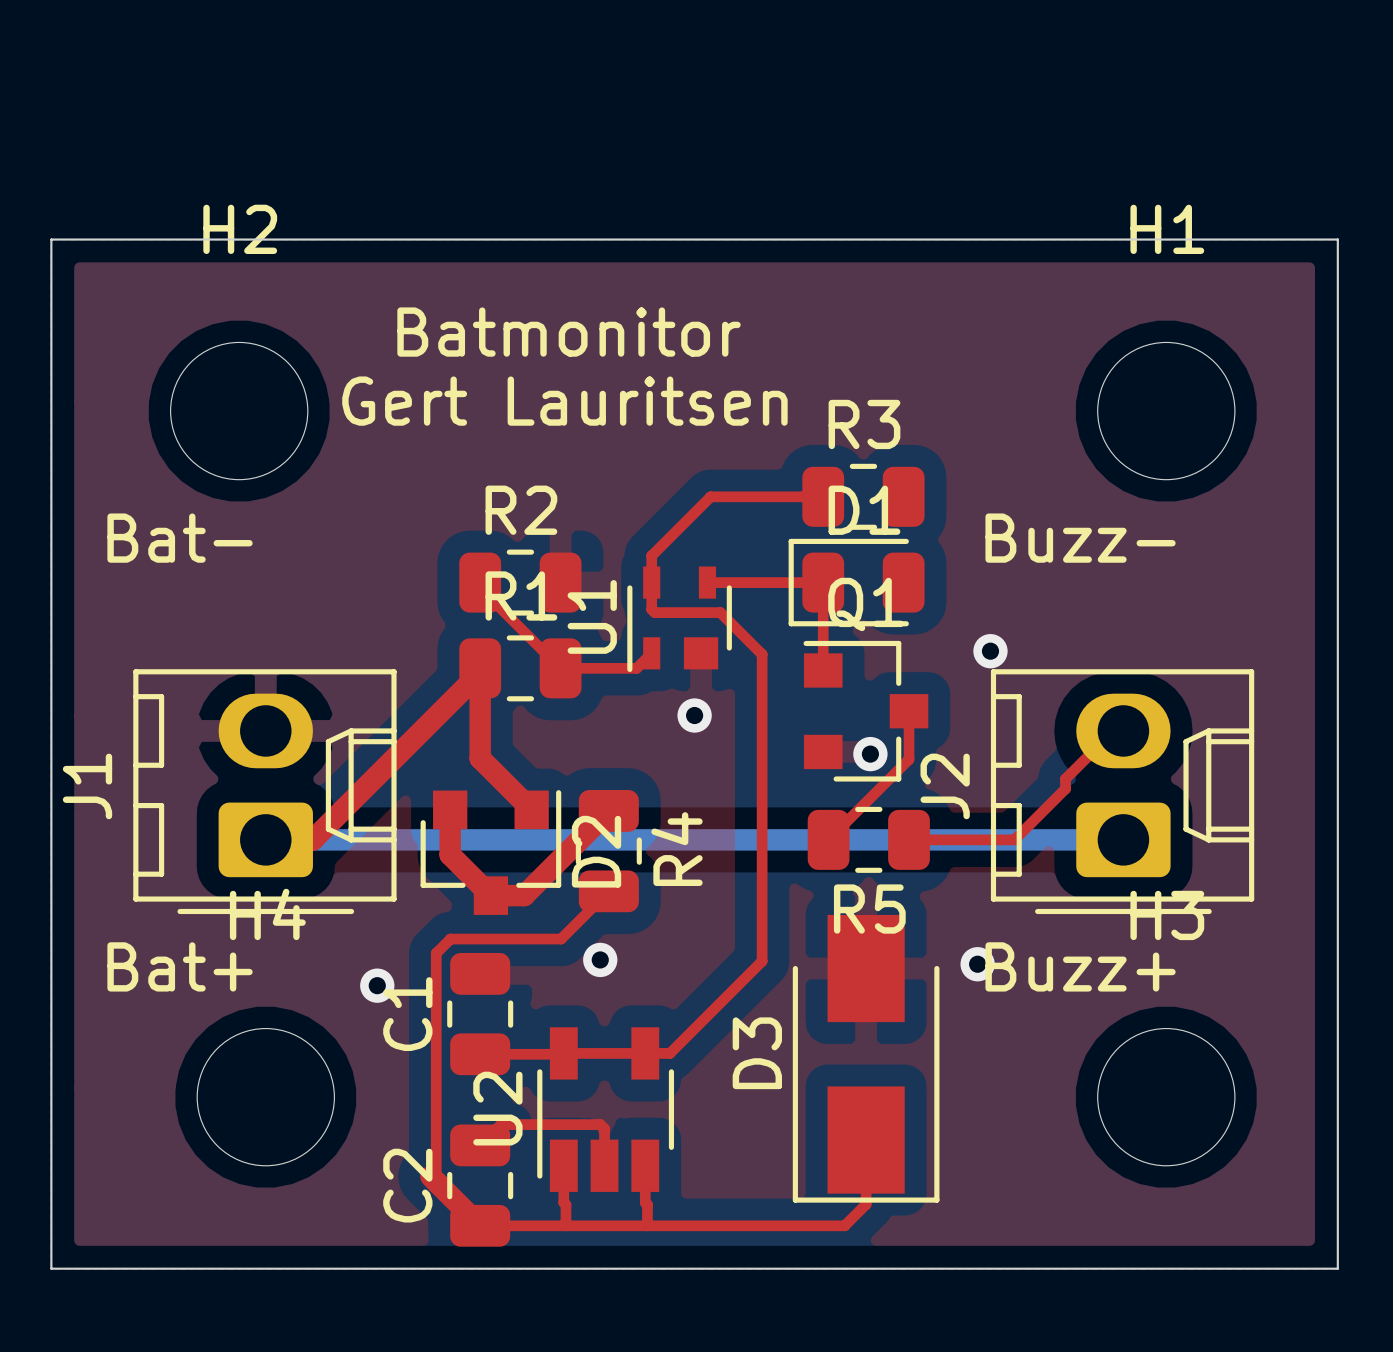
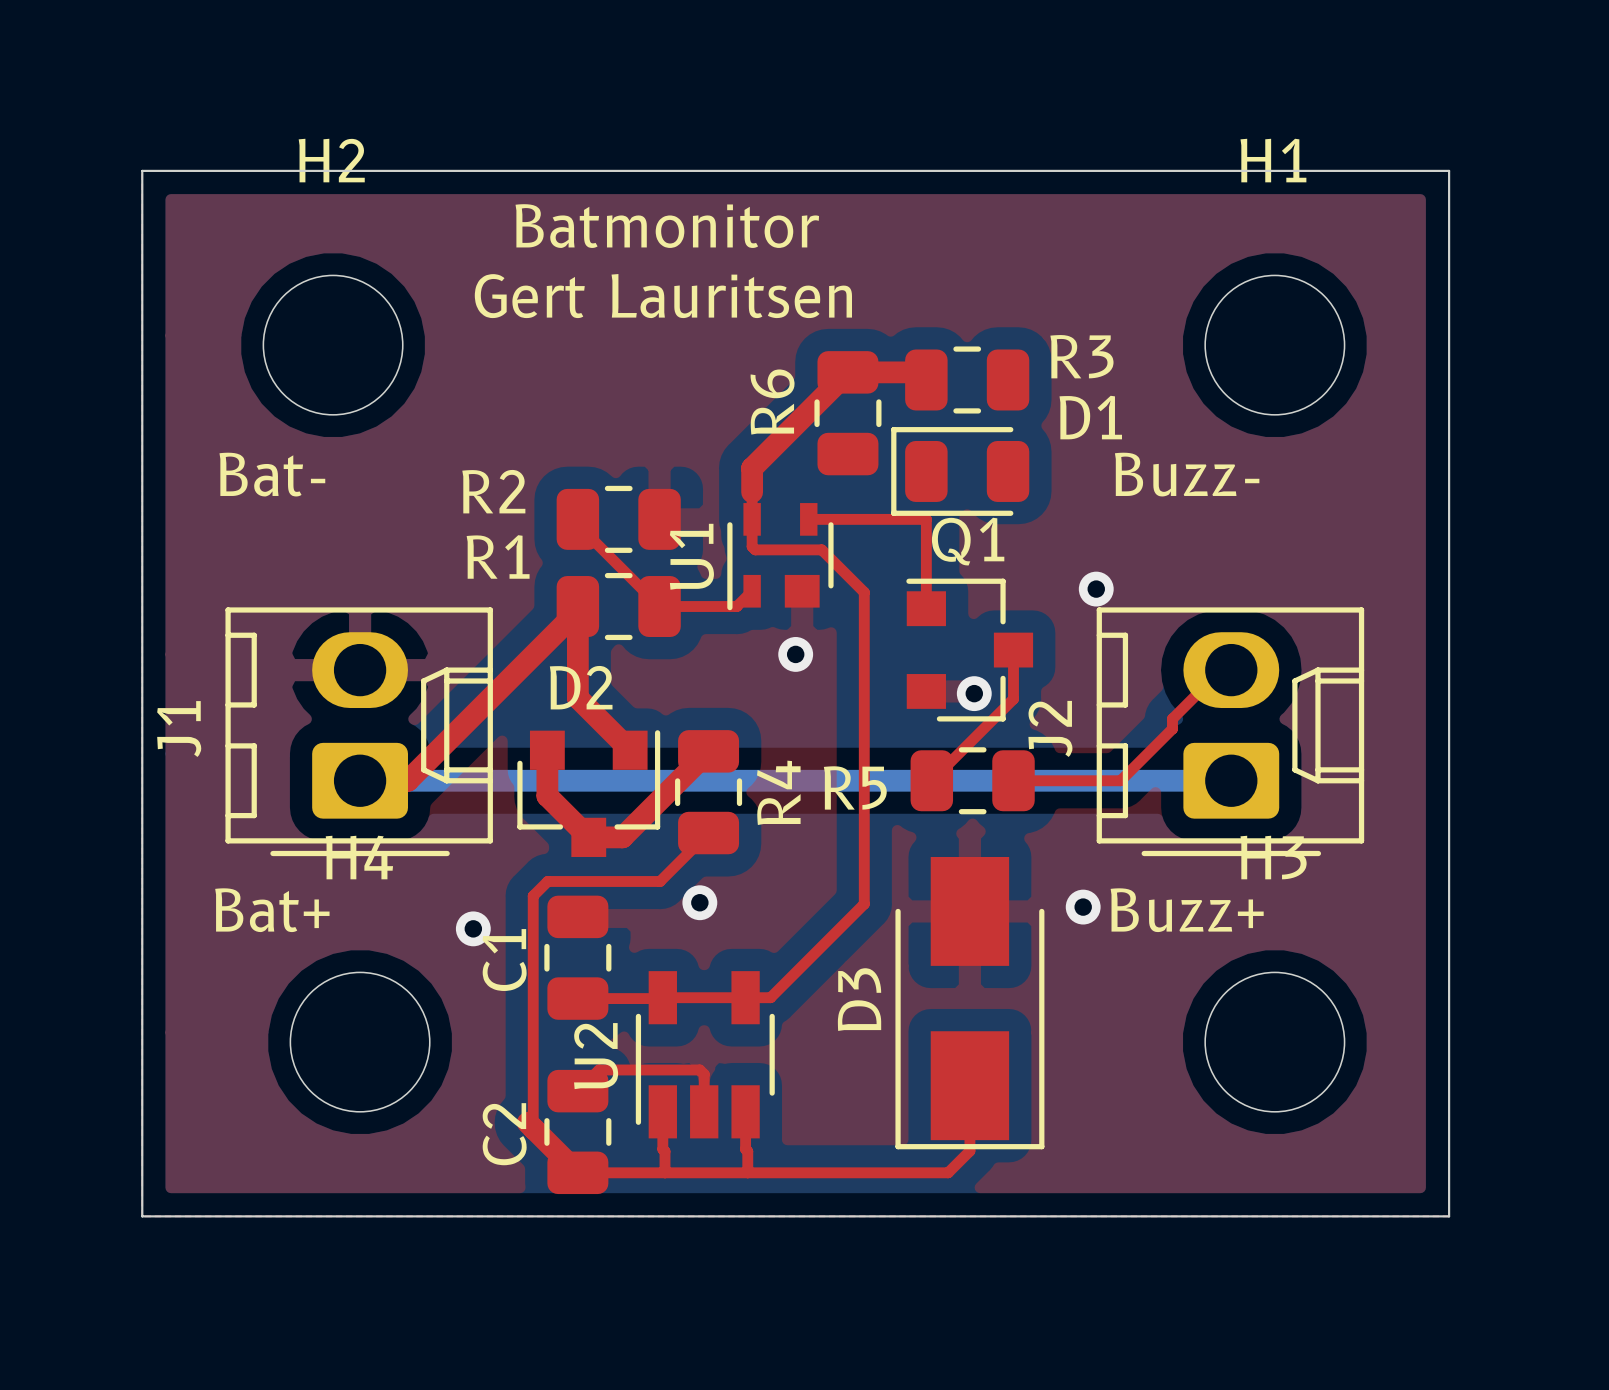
text position: Batmonitor (569, 332) -> Batmonitor (667, 226)
text position: Gert Lauritsen (564, 401) -> Gert Lauritsen (663, 296)
R3 name position: R3 (864, 424) -> R3 (1081, 356)
R6: none -> (847, 413)
top track: (823, 496) (710, 496) (651, 555) -> (926, 379) (918, 372) (847, 372) (752, 468) (752, 492)
R3 position: (863, 496) -> (967, 379)
R2 name position: R2 (521, 510) -> R2 (493, 491)
D1 name position: D1 (864, 510) -> D1 (1090, 417)
D1 position: (856, 582) -> (960, 471)
R1 name position: R1 (521, 595) -> R1 (498, 556)
D2 name rotation: 0° (596, 851) -> 90° clockwise (581, 687)
D2 name position: D2 (596, 851) -> D2 (581, 687)
R5 name position: R5 (869, 909) -> R5 (855, 787)

